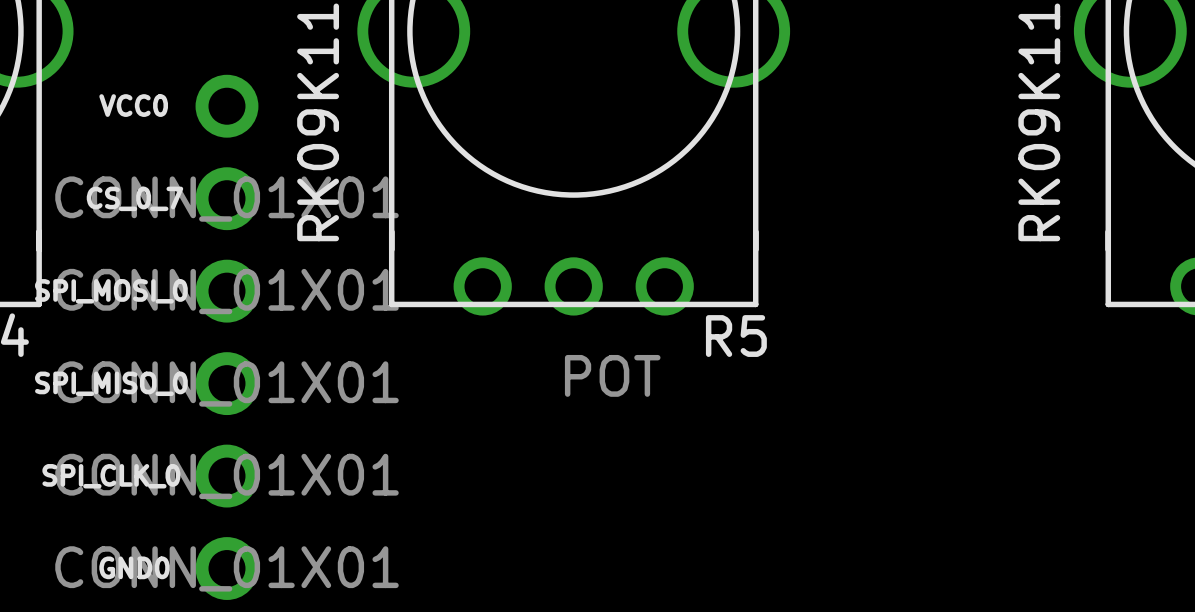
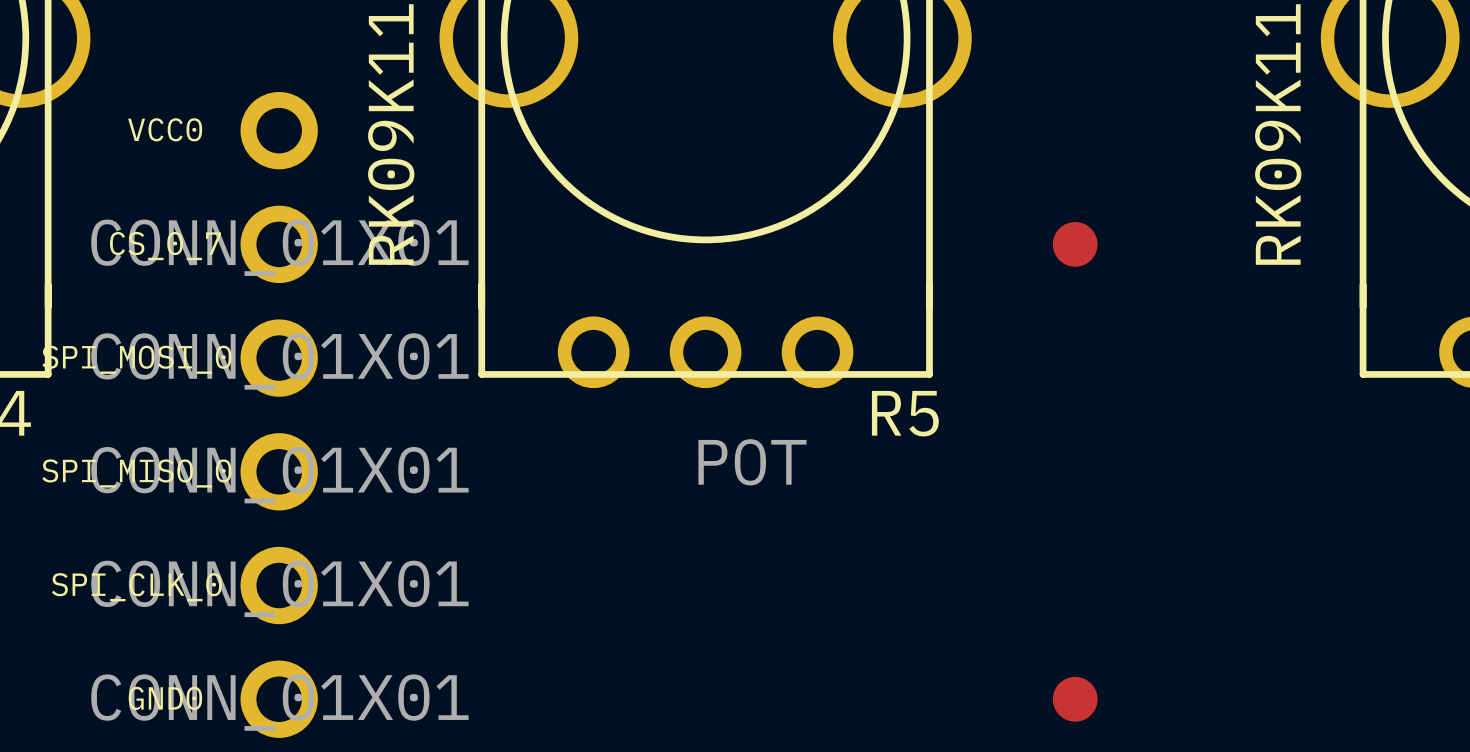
part: none -> (1075, 244)
part: none -> (1075, 699)

